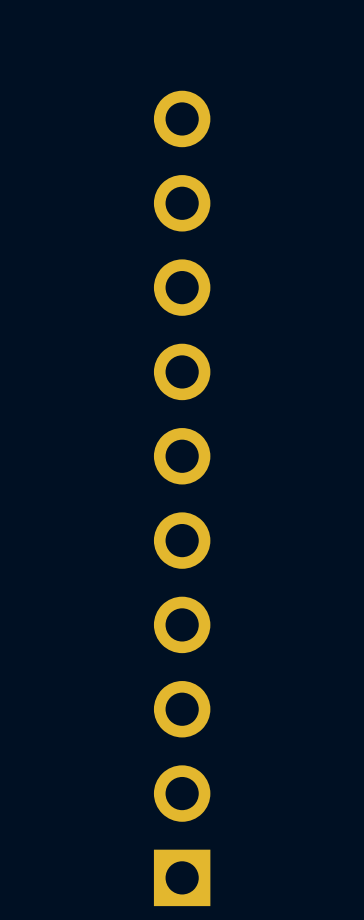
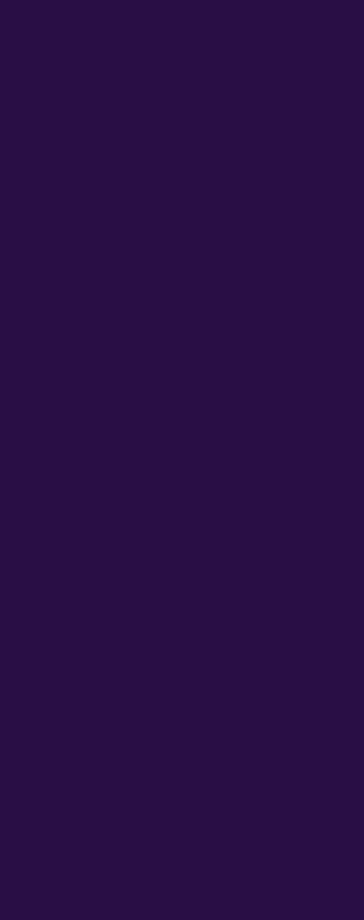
part: (182, 498) -> none

